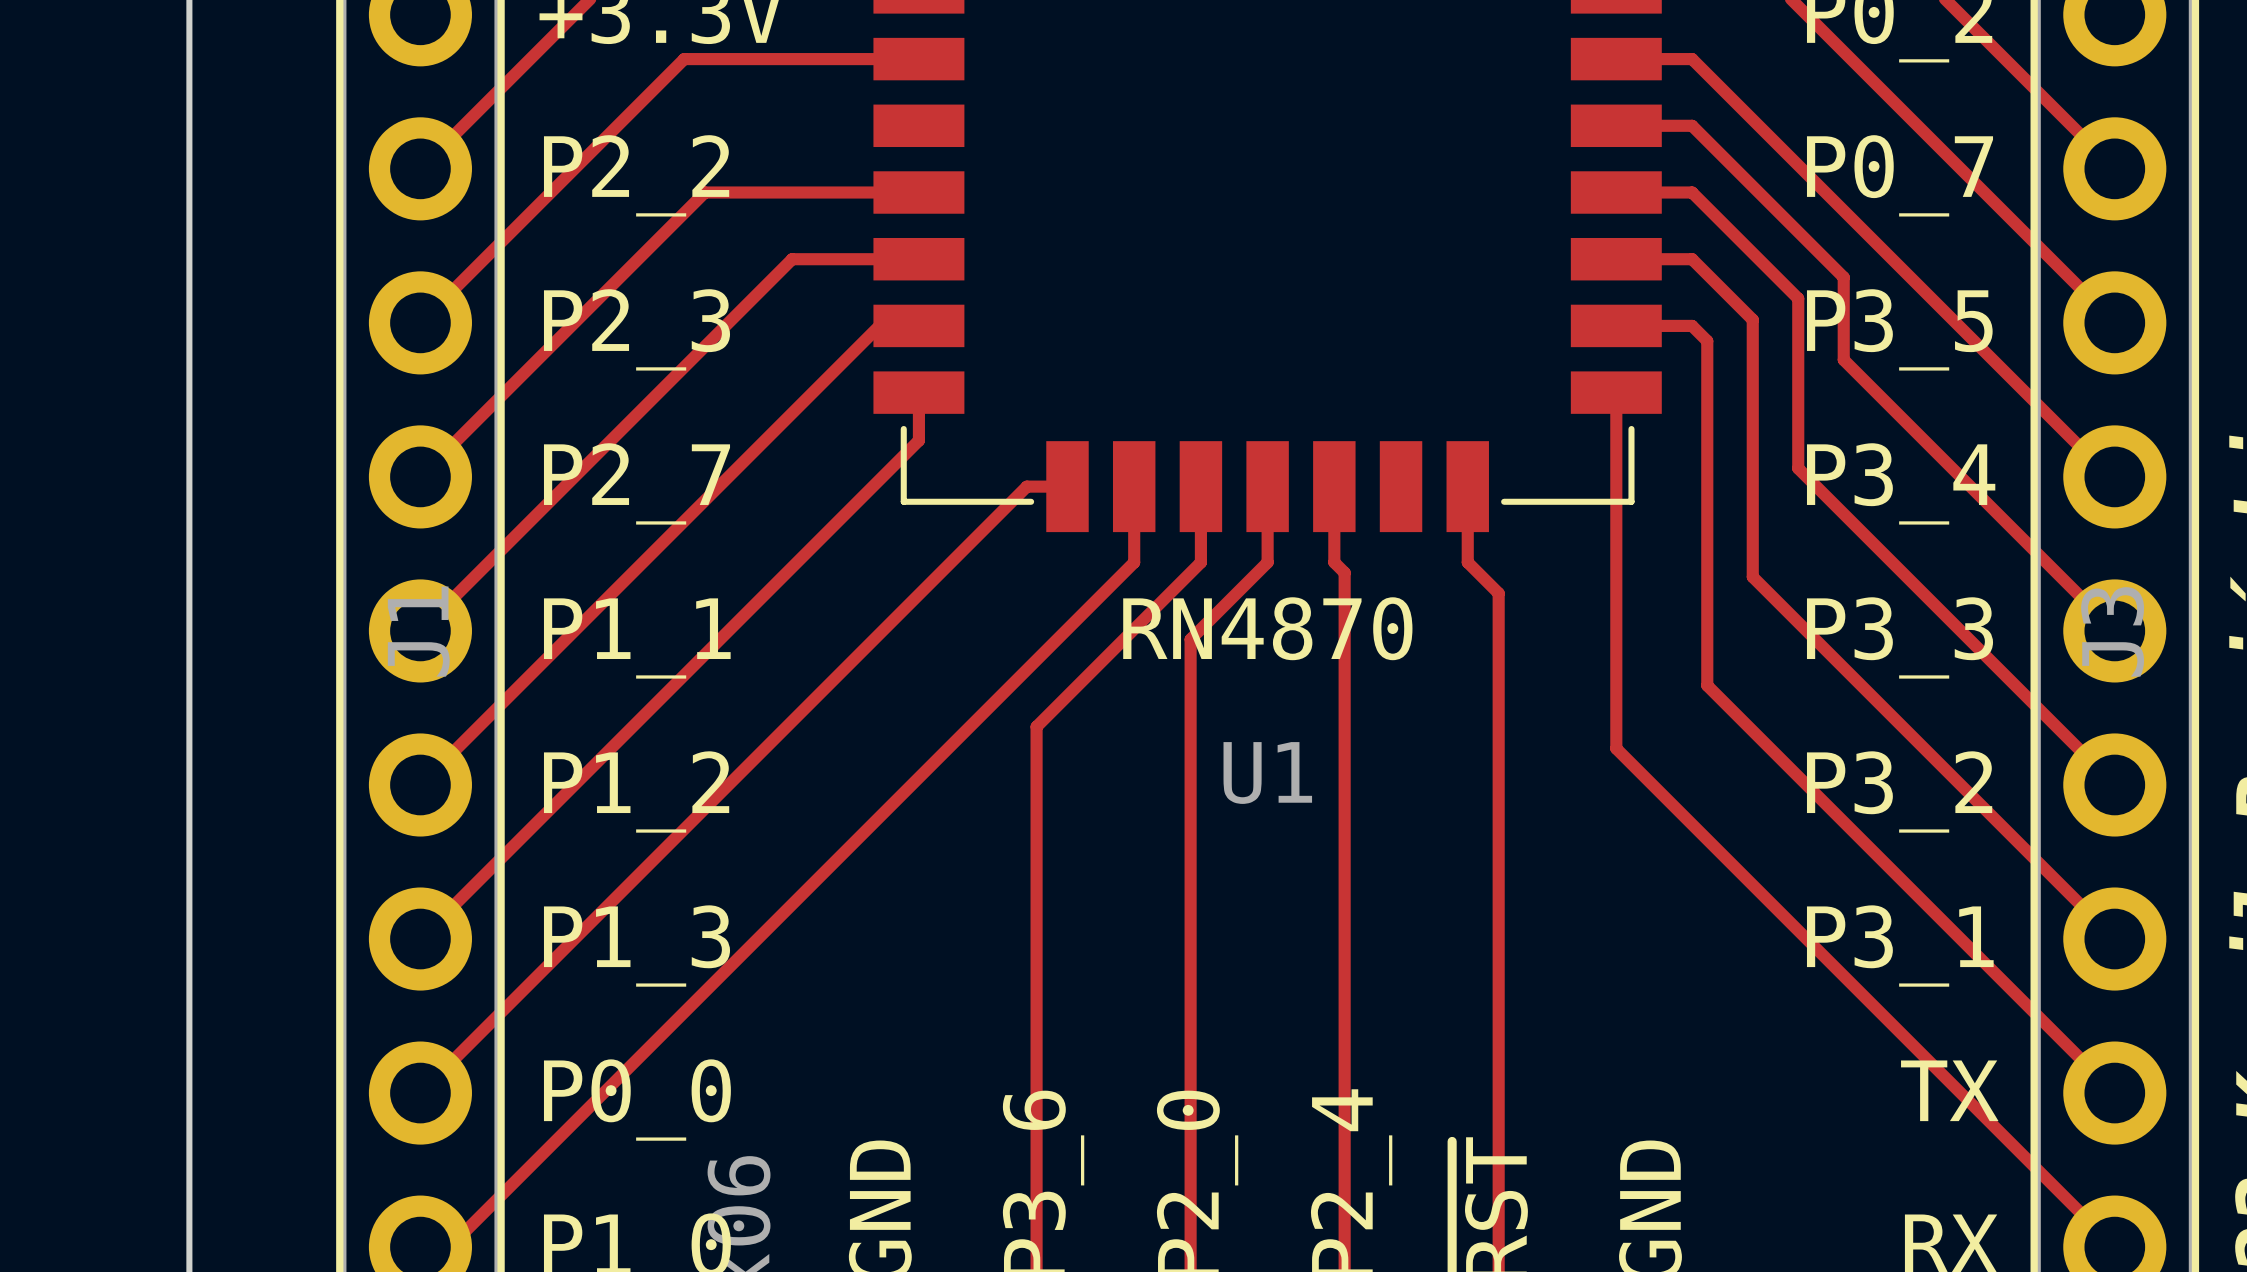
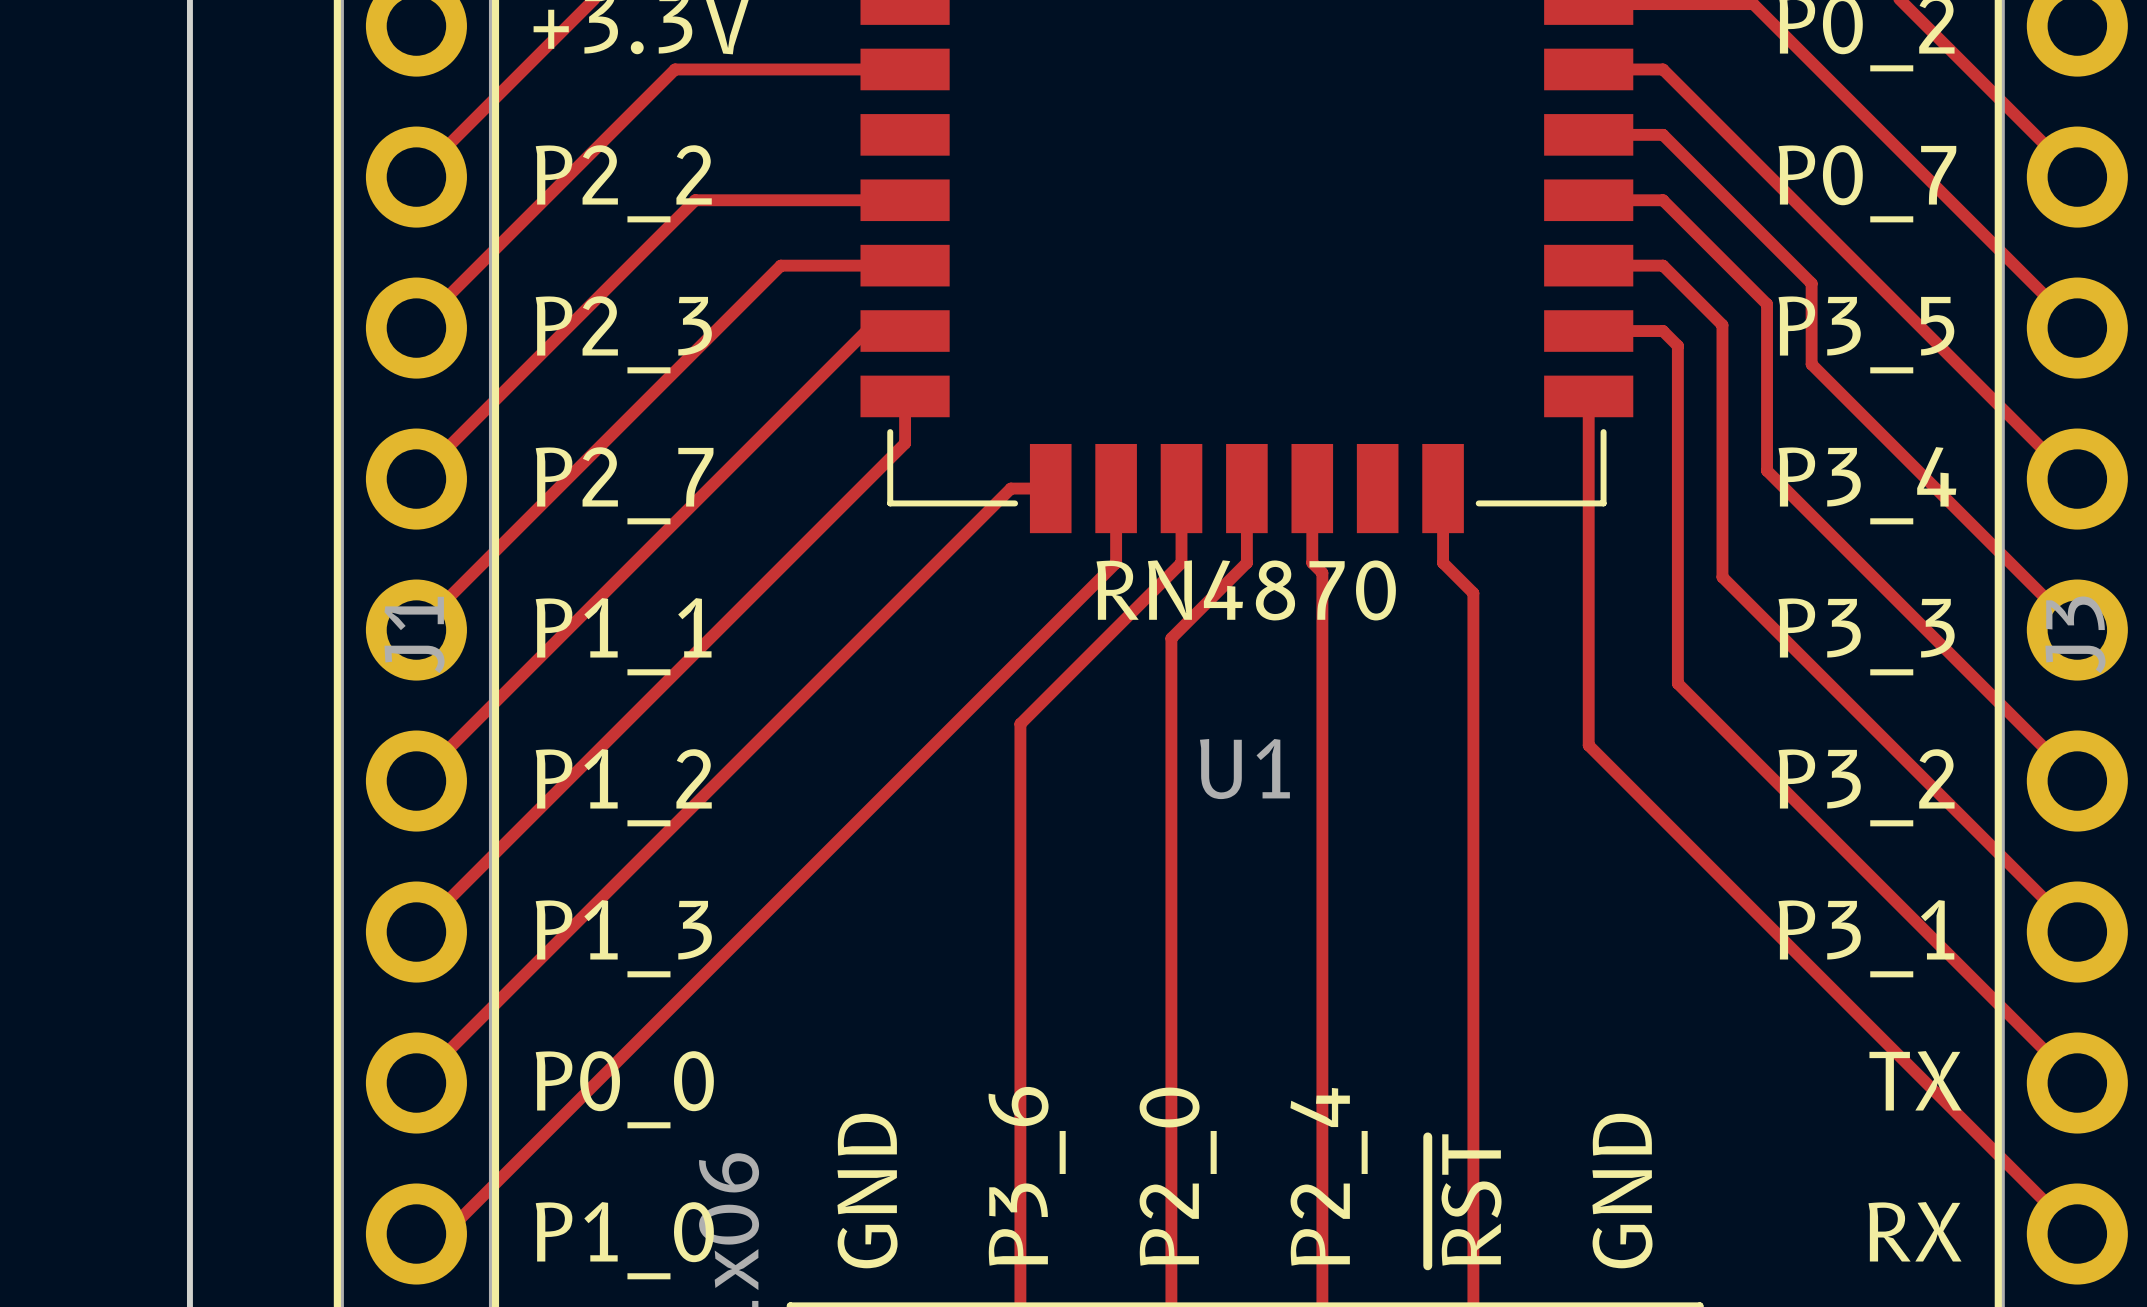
U1 value position: RN4870 (1267, 628) -> RN4870 (1246, 590)

